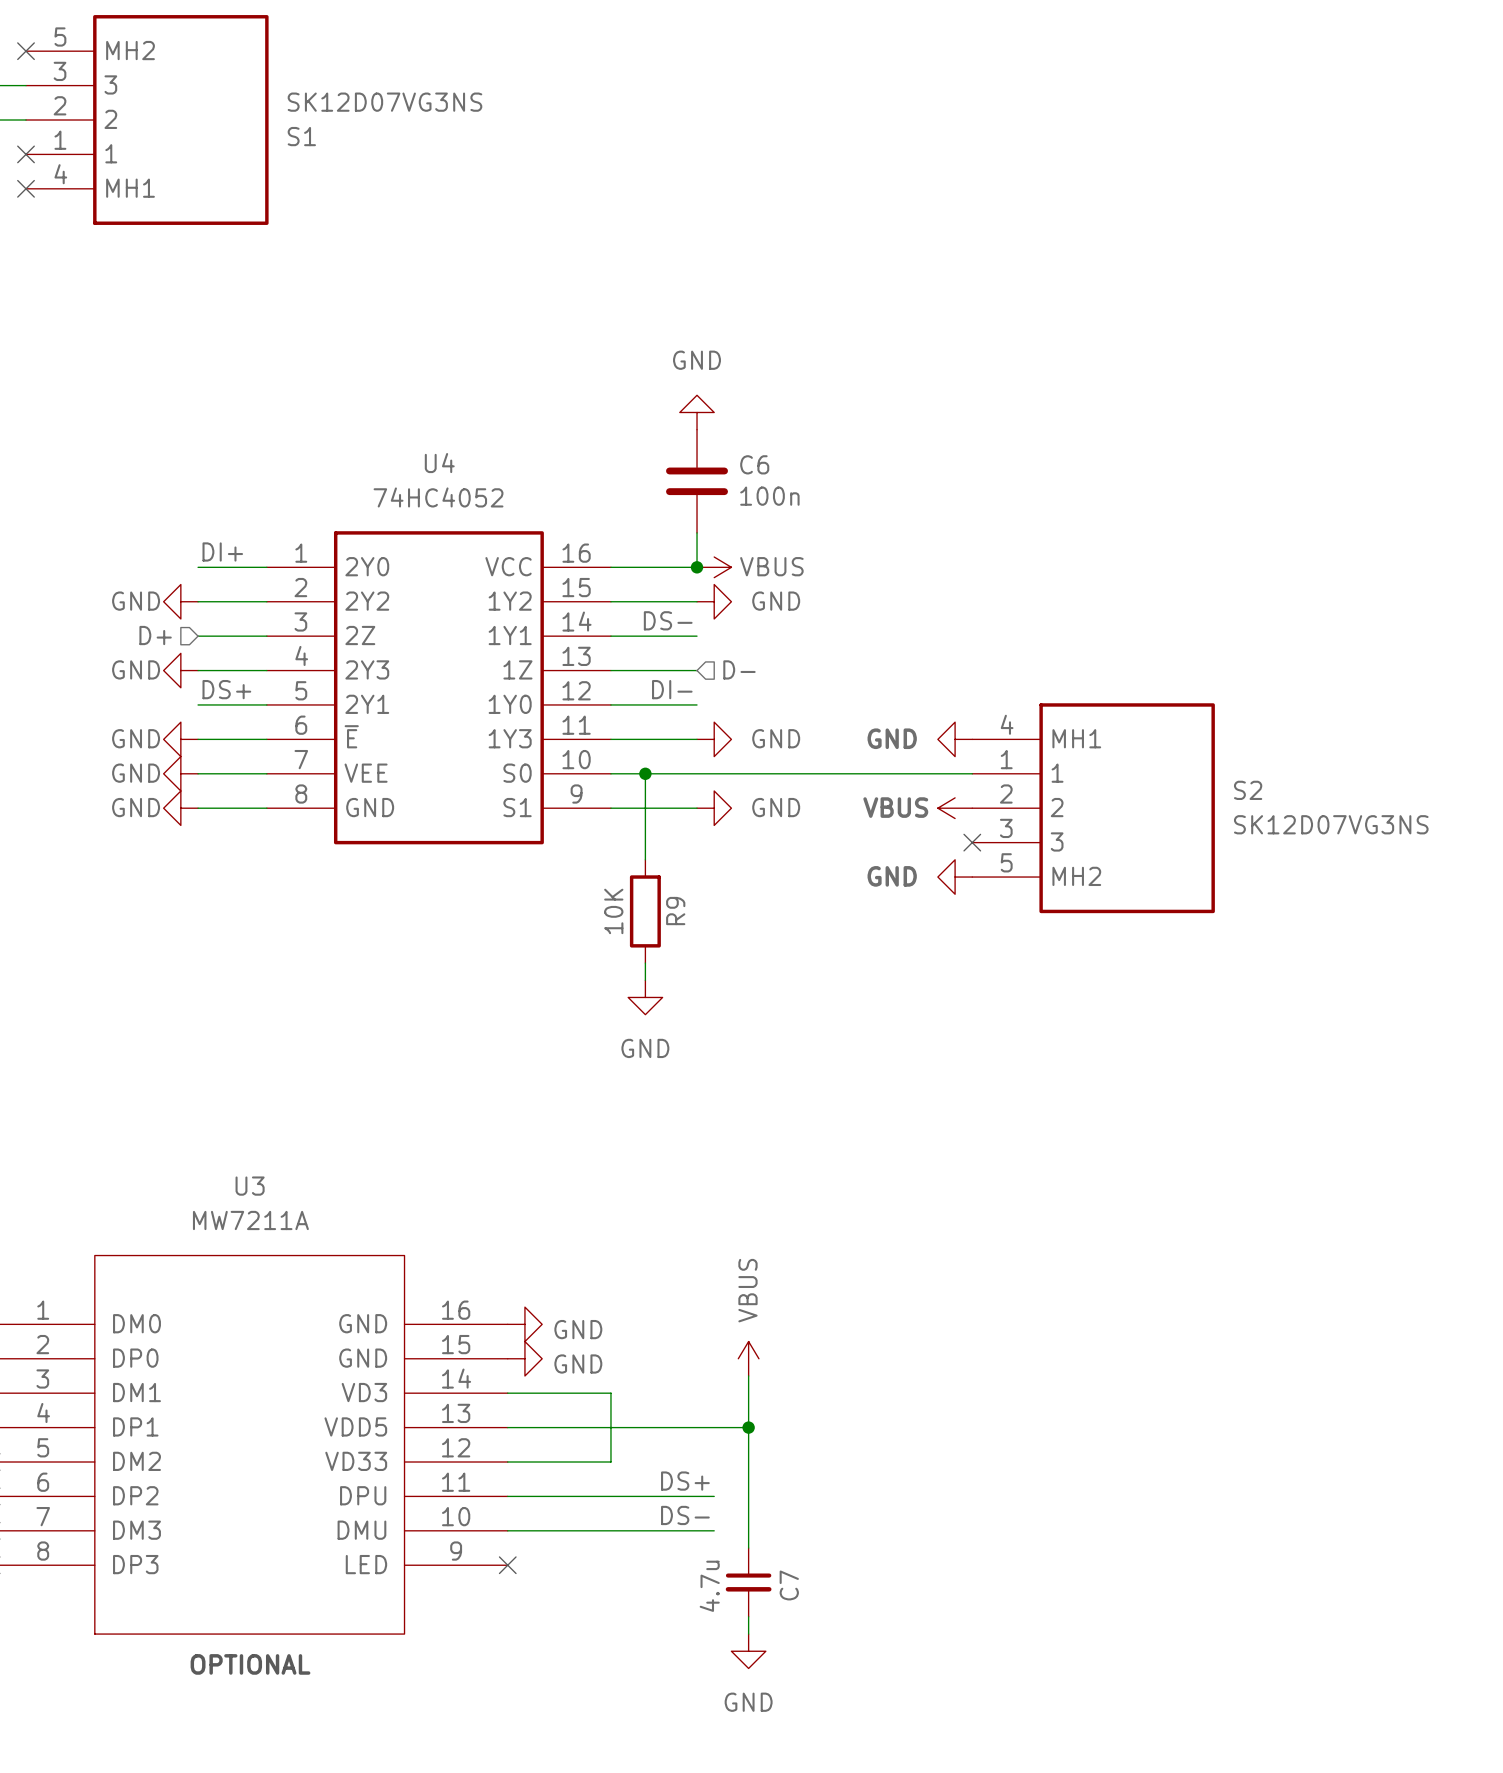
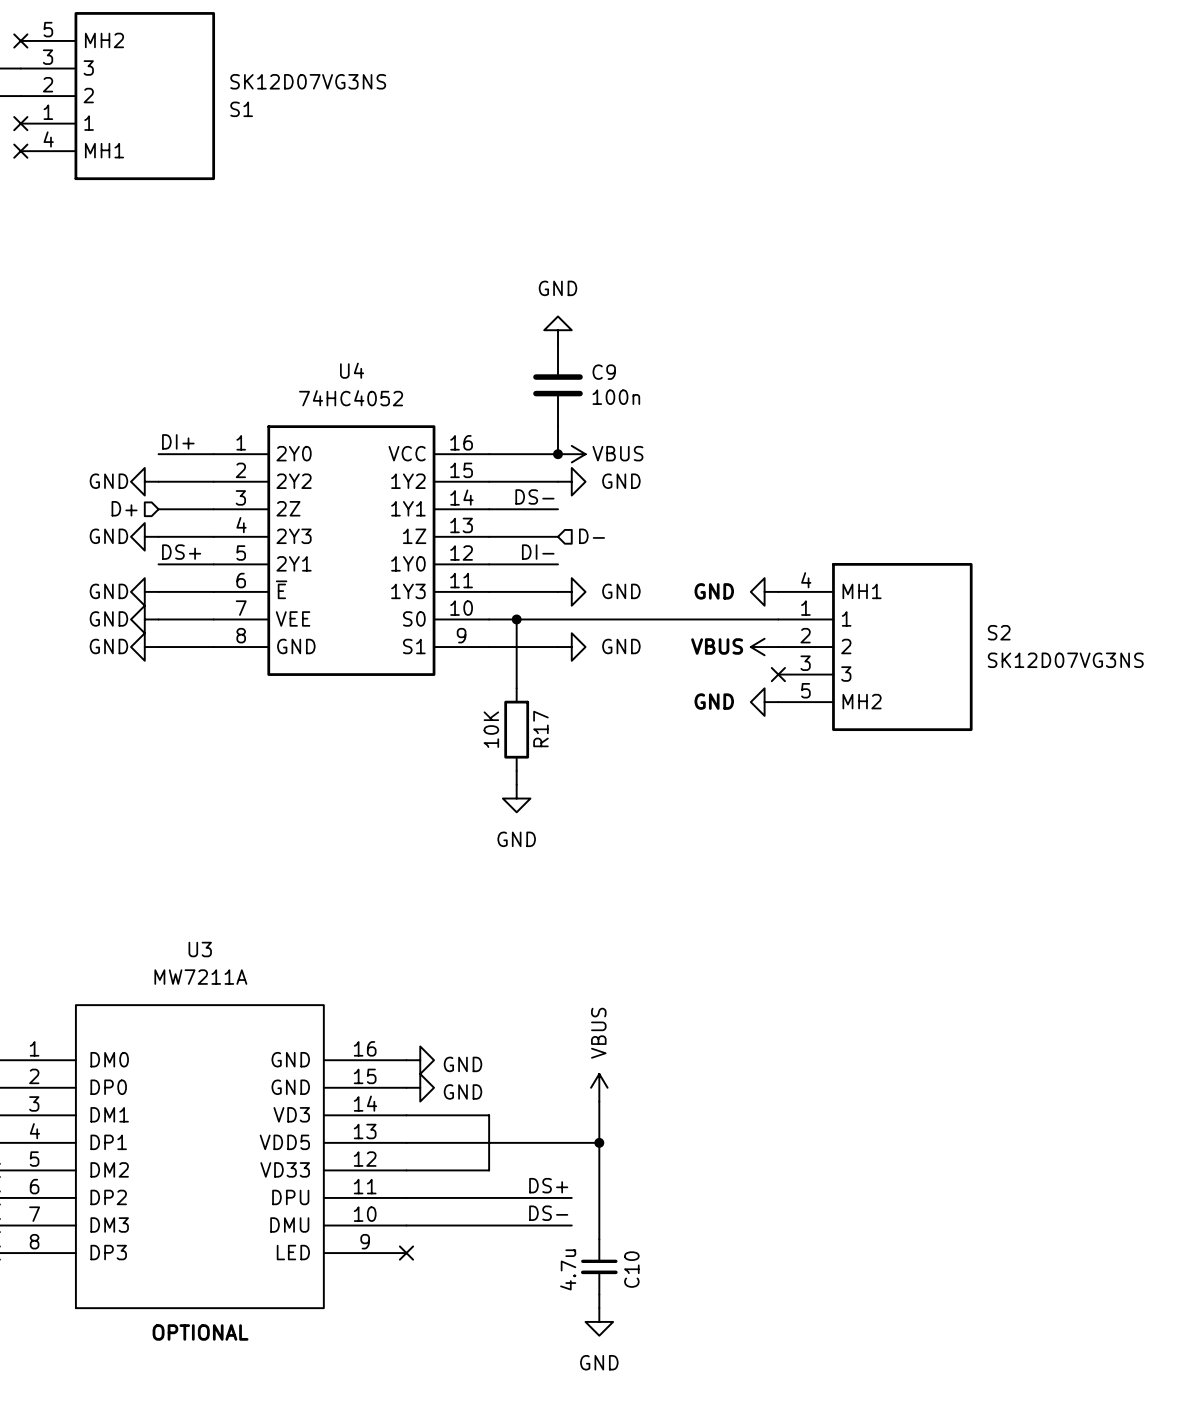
C6 name: C6 (754, 464) -> C9 (604, 372)
R9 name: R9 (675, 911) -> R17 (540, 729)
C7 name: C7 (789, 1585) -> C10 (631, 1269)

